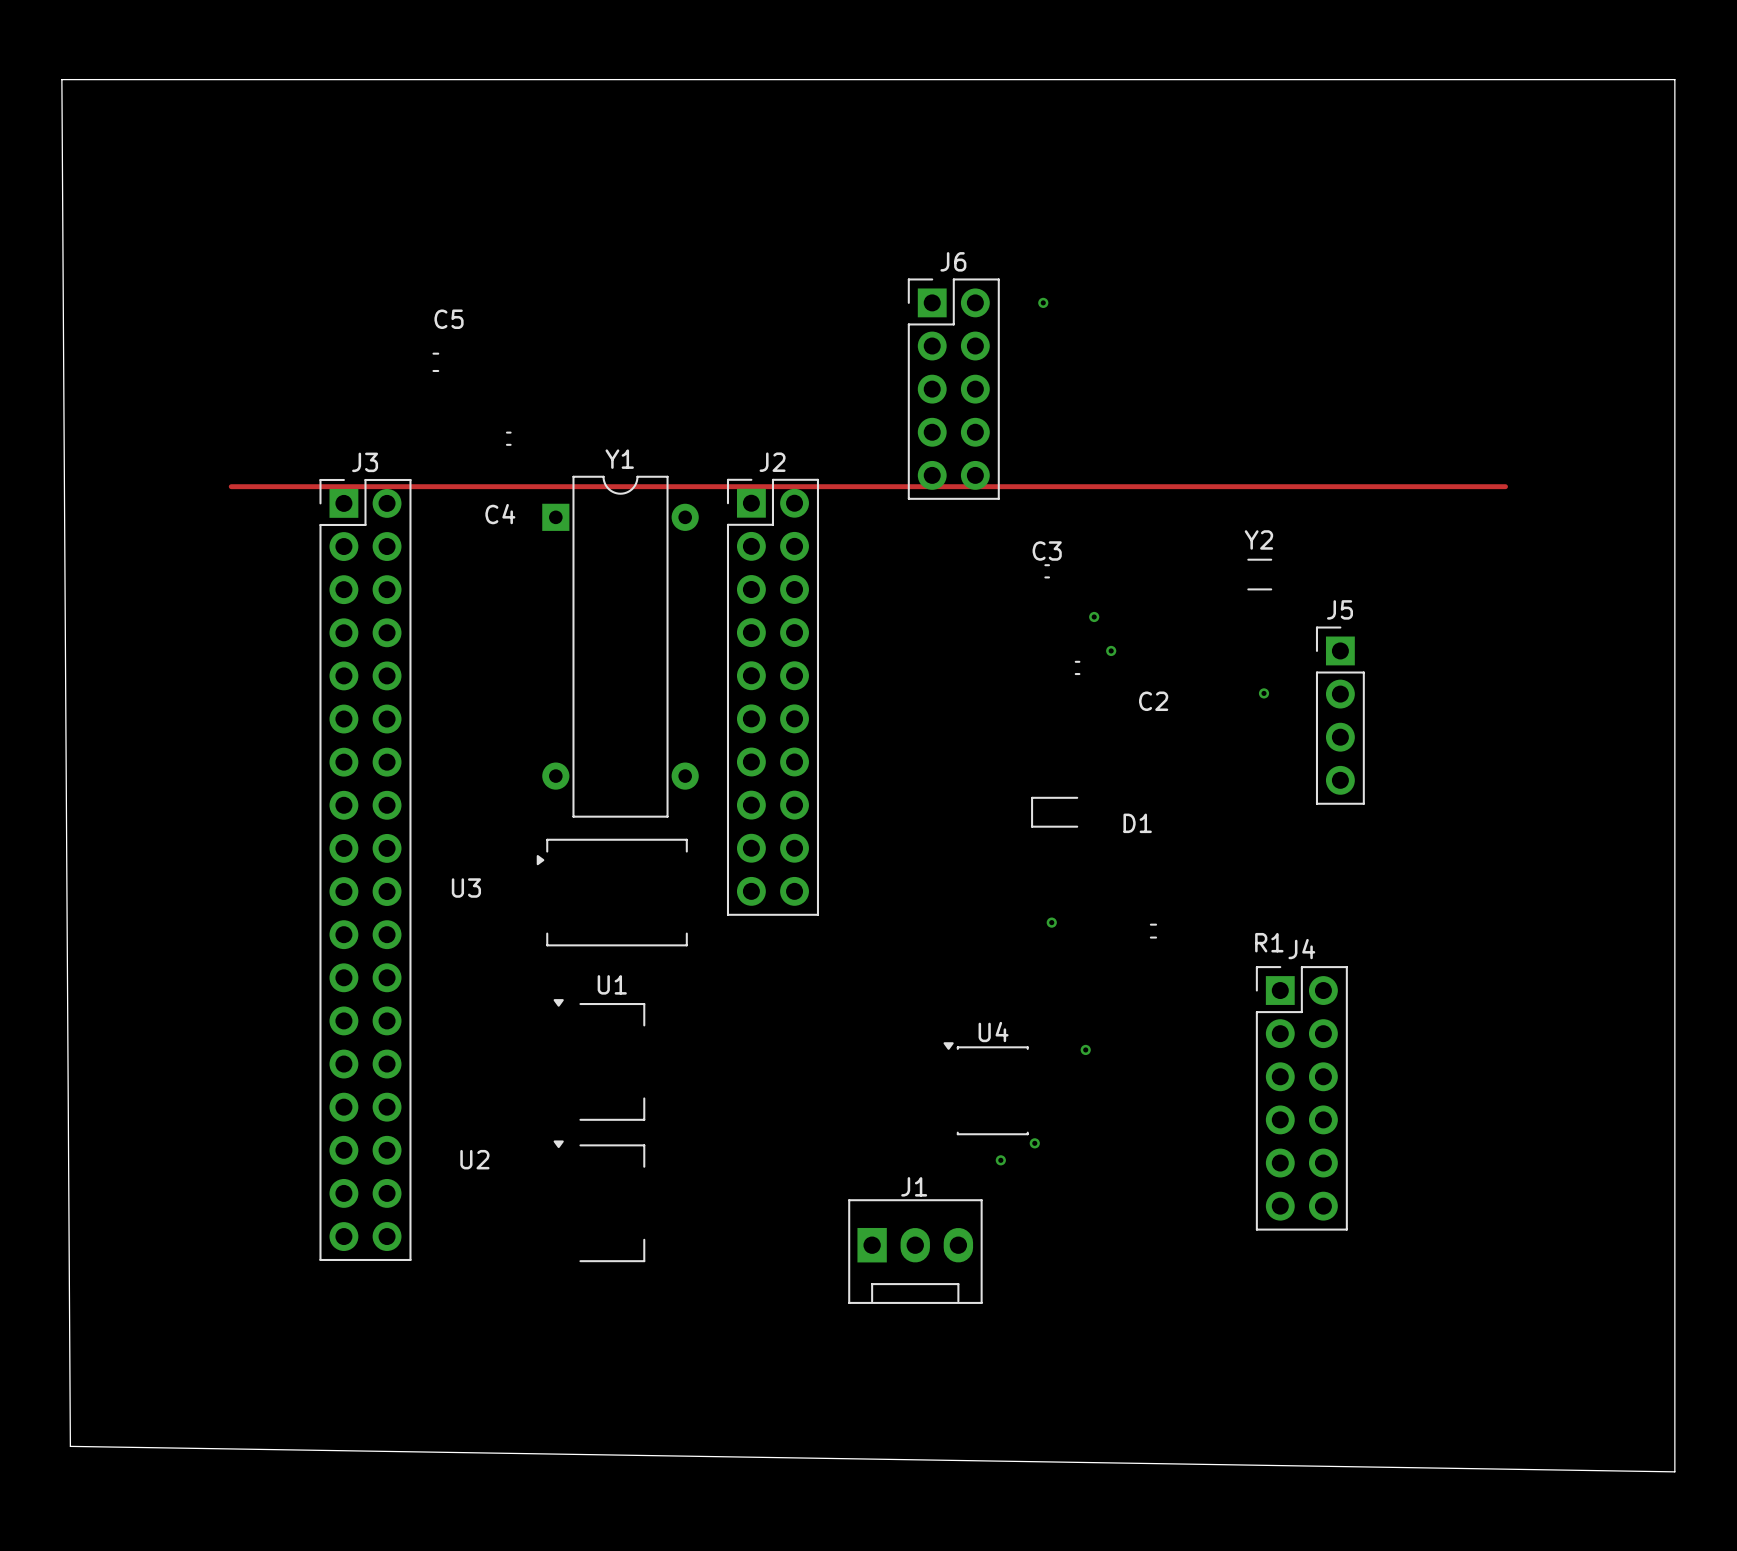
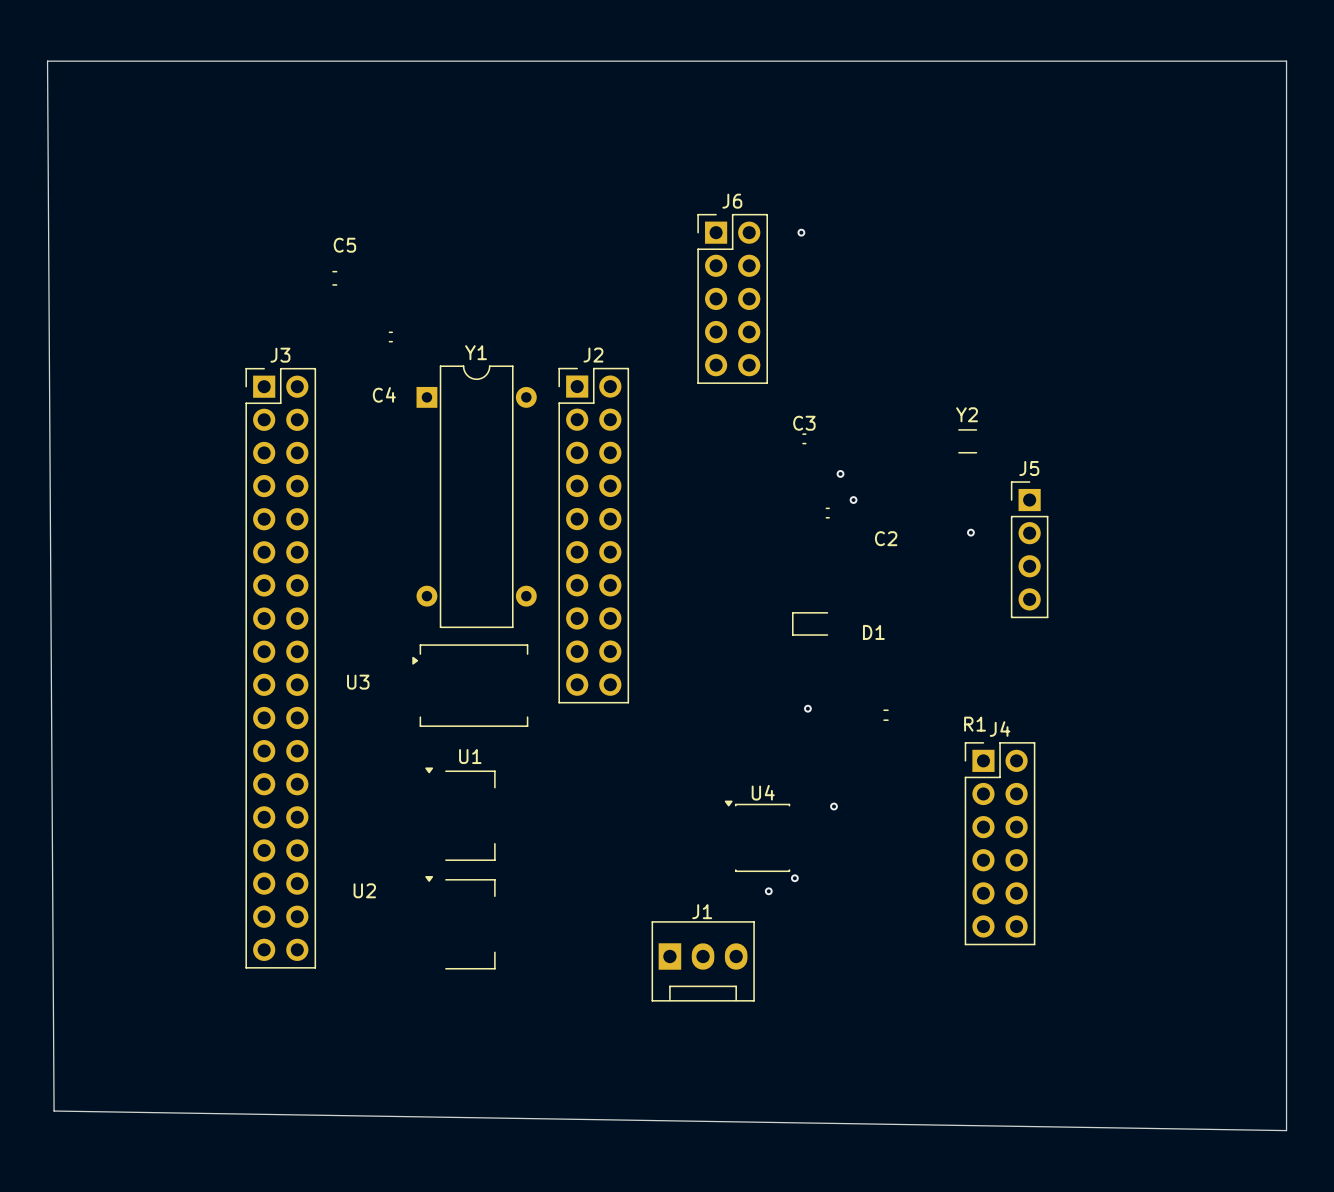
track: (231, 486) (1505, 486) -> none

